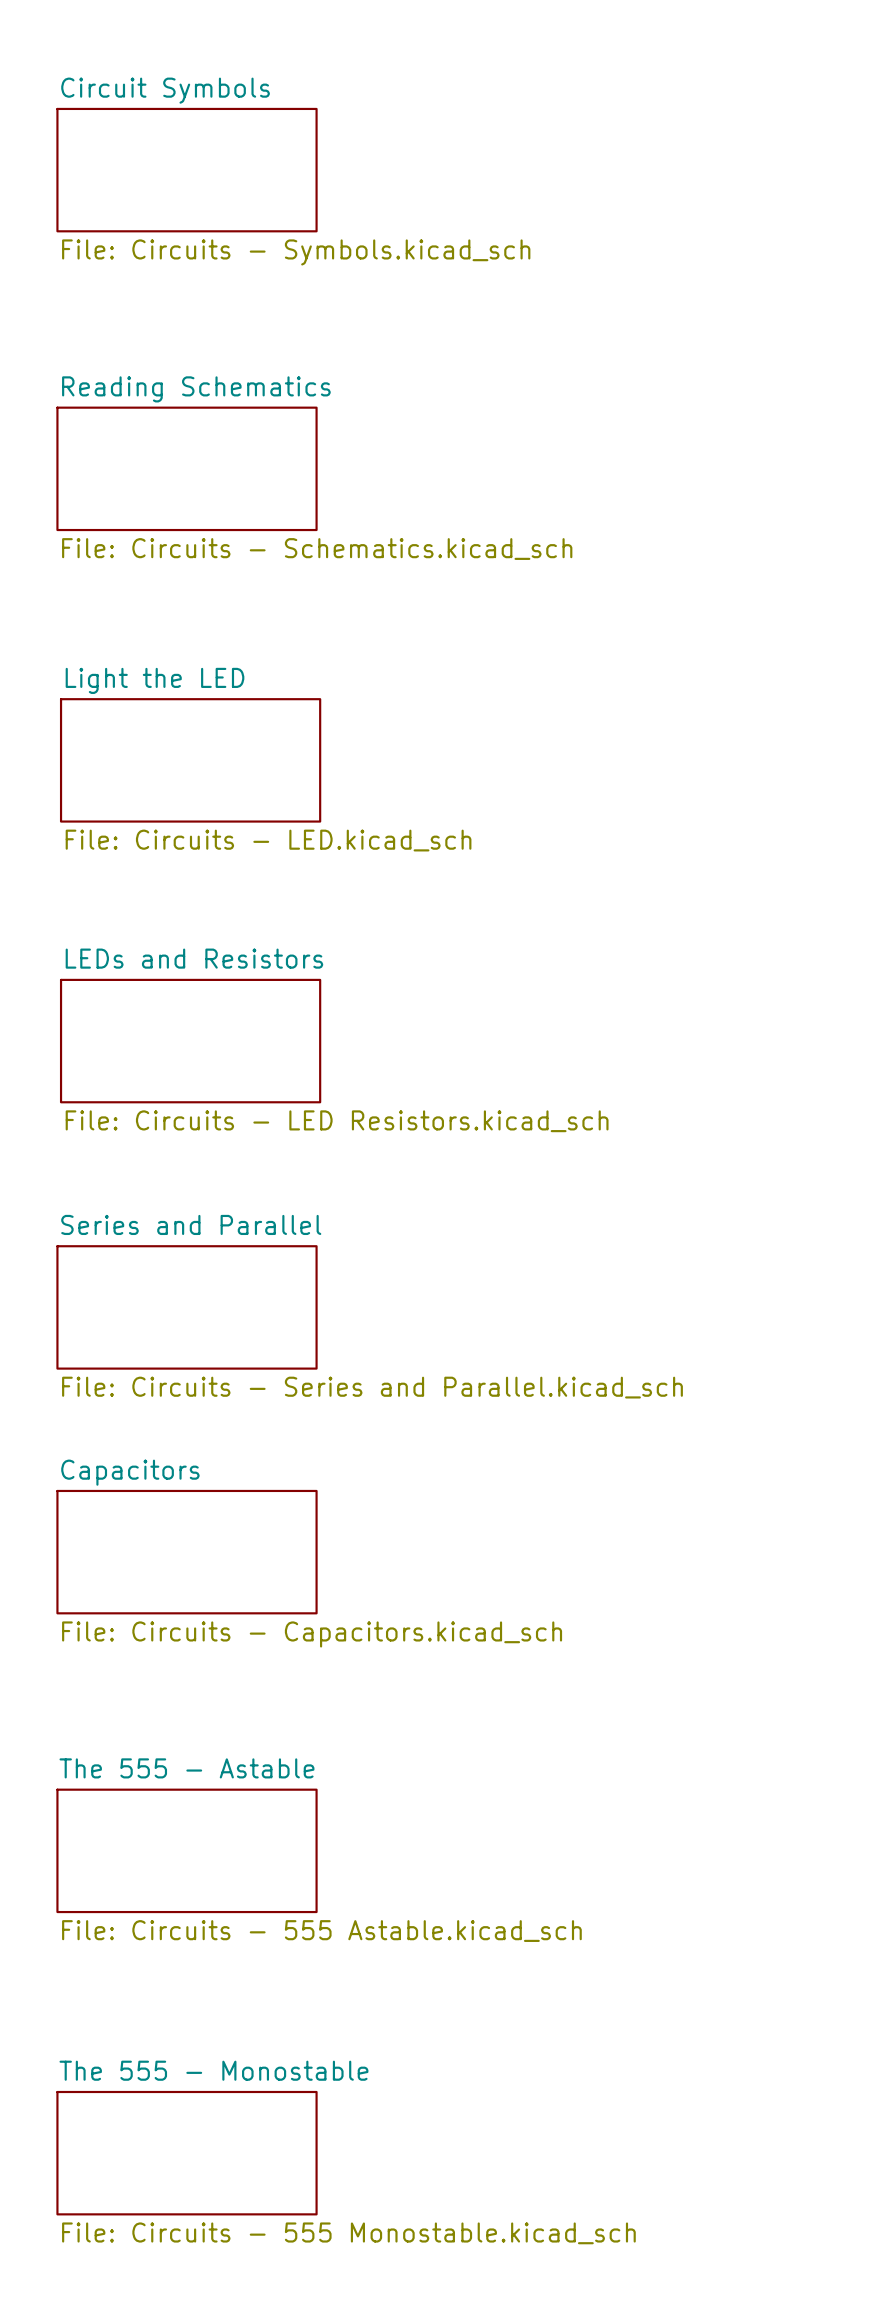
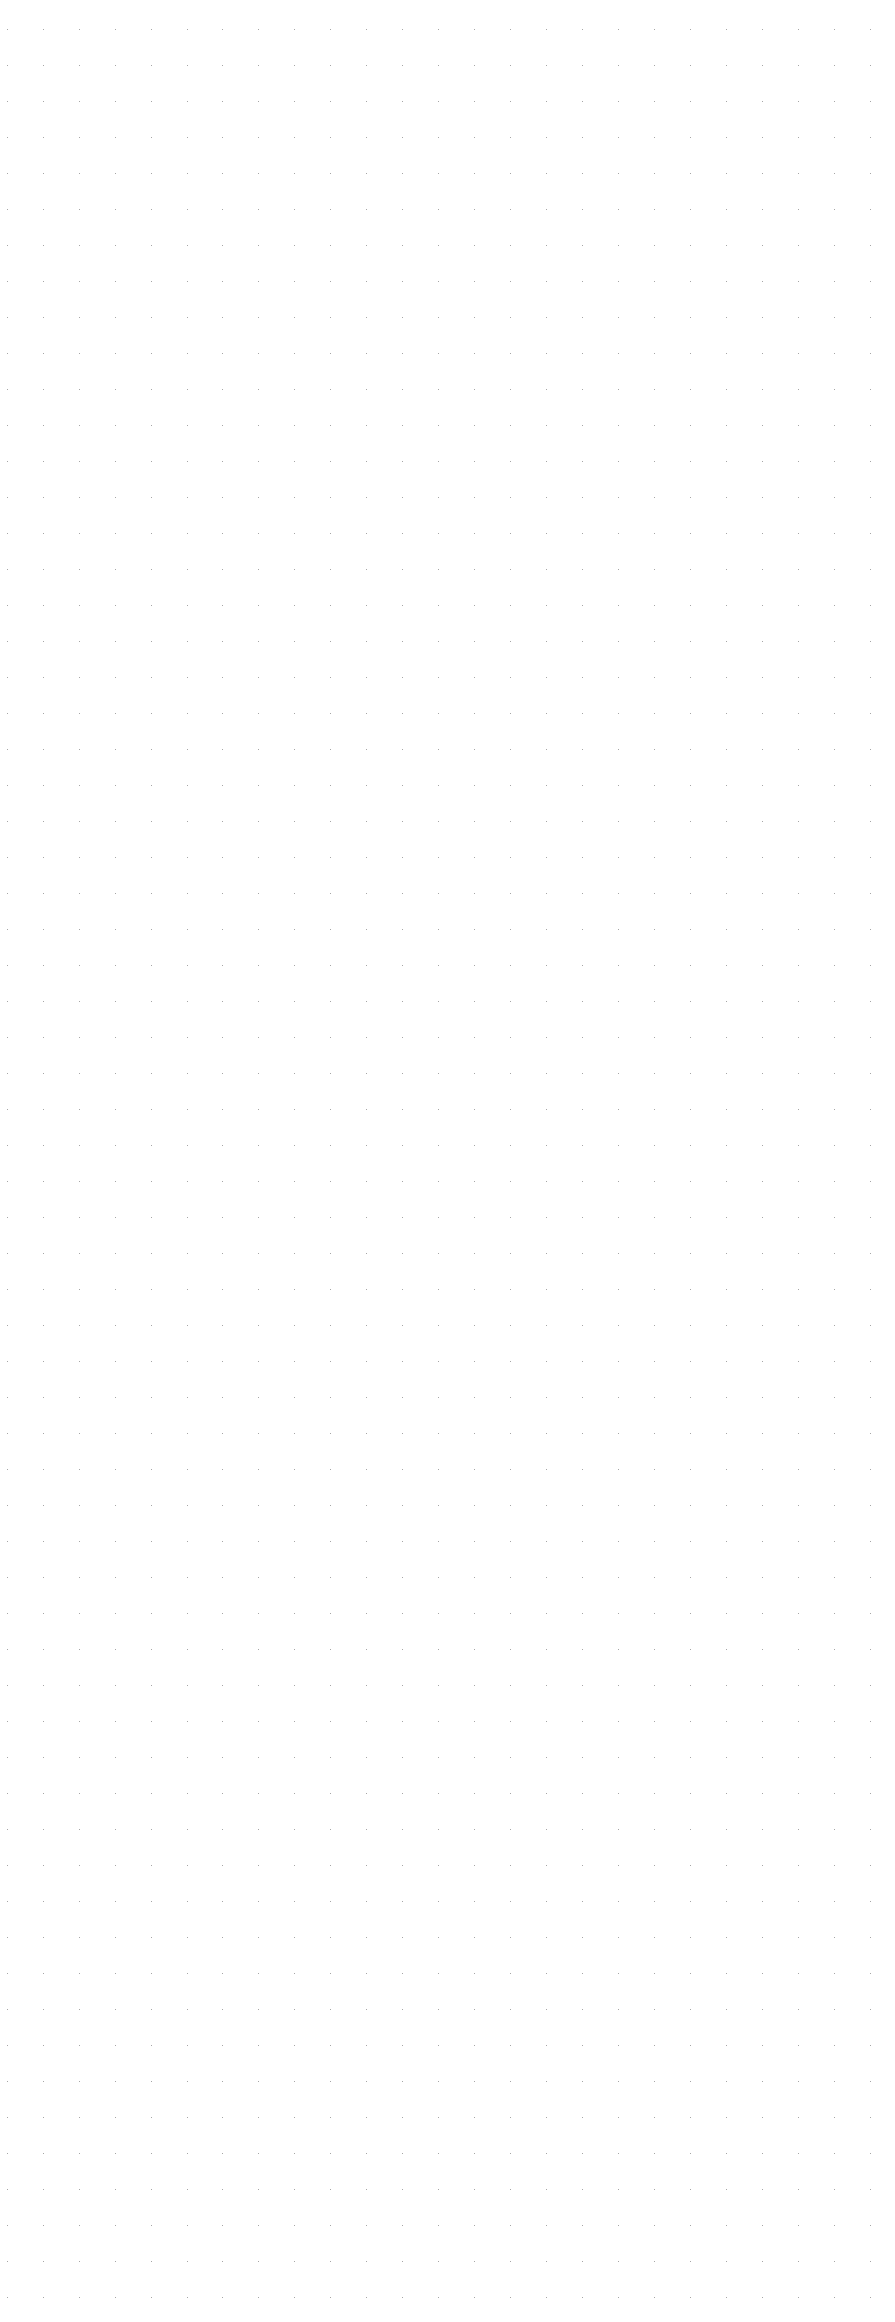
sheet Circuit Symbols: File: Circuits - Symbols.kicad_sch (187, 170) -> none
sheet Reading Schematics: File: Circuits - Schematics.kicad_sch (187, 468) -> none
sheet Light the LED: File: Circuits - LED.kicad_sch (190, 760) -> none
sheet LEDs and Resistors: File: Circuits - LED Resistors.kicad_sch (190, 1041) -> none
sheet Series and Parallel: File: Circuits - Series and Parallel.kicad_sch (187, 1307) -> none
sheet Capacitors: File: Circuits - Capacitors.kicad_sch (187, 1552) -> none
sheet The 555 - Astable: File: Circuits - 555 Astable.kicad_sch (187, 1850) -> none
sheet The 555 - Monostable: File: Circuits - 555 Monostable.kicad_sch (187, 2153) -> none

